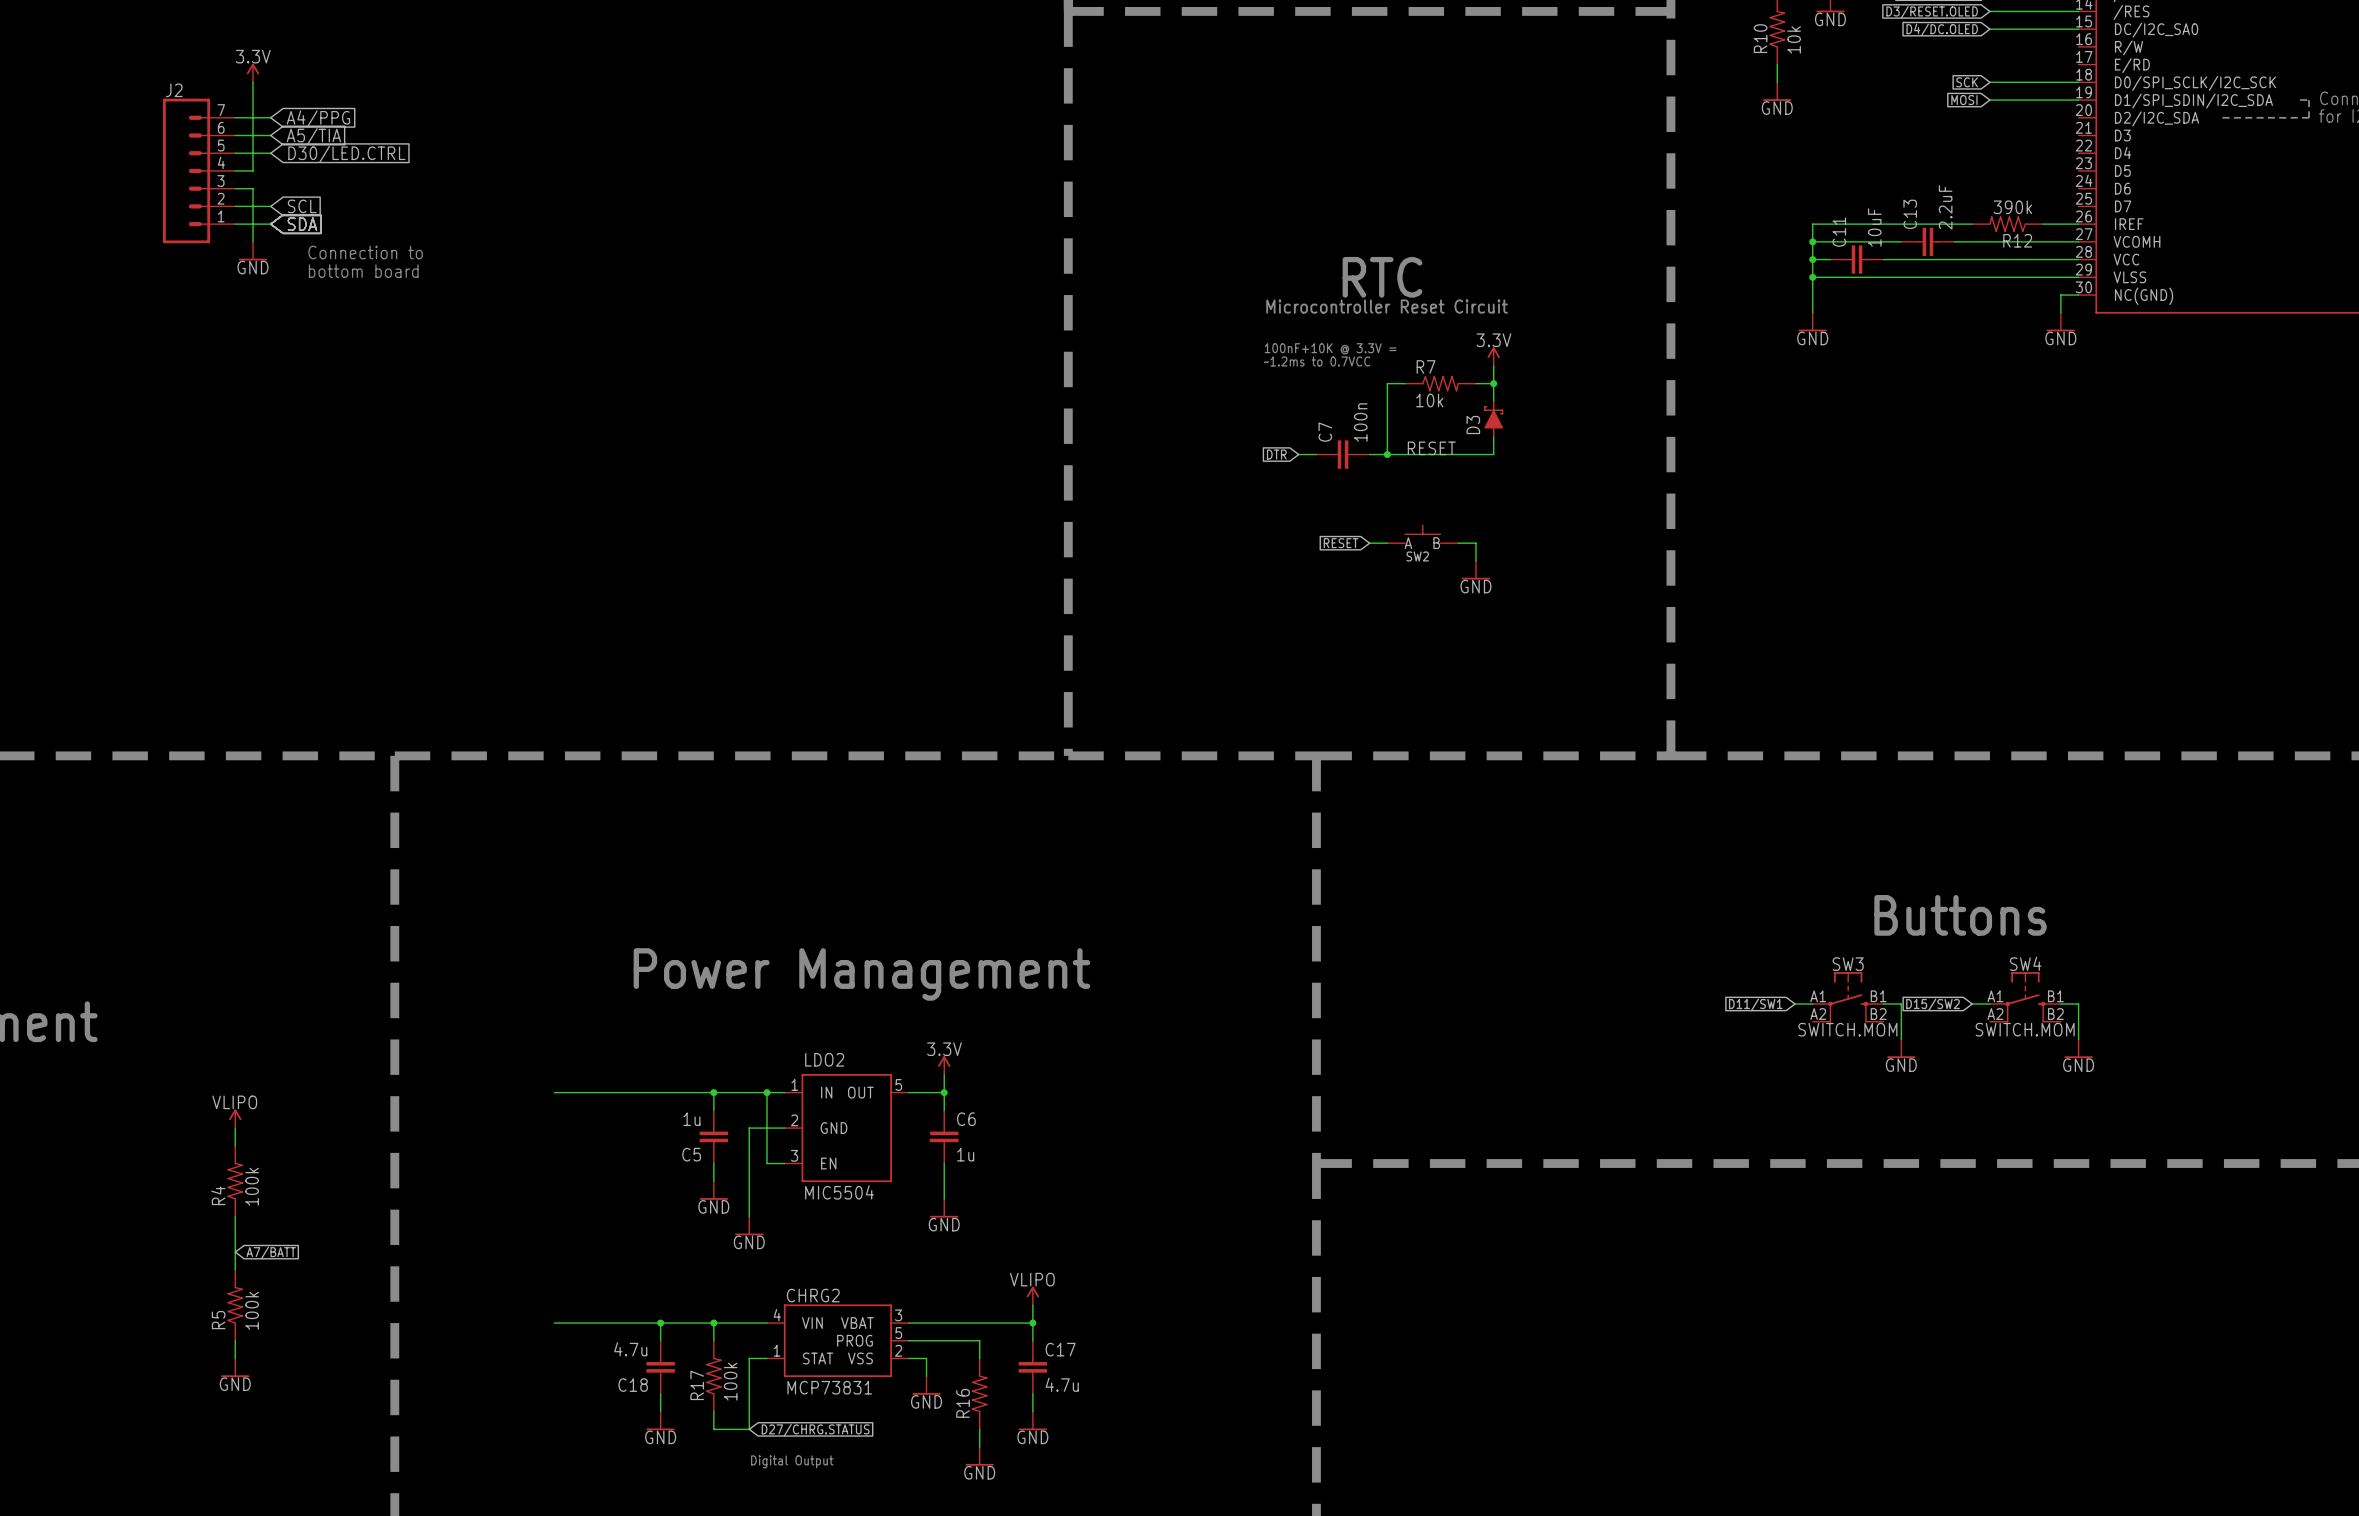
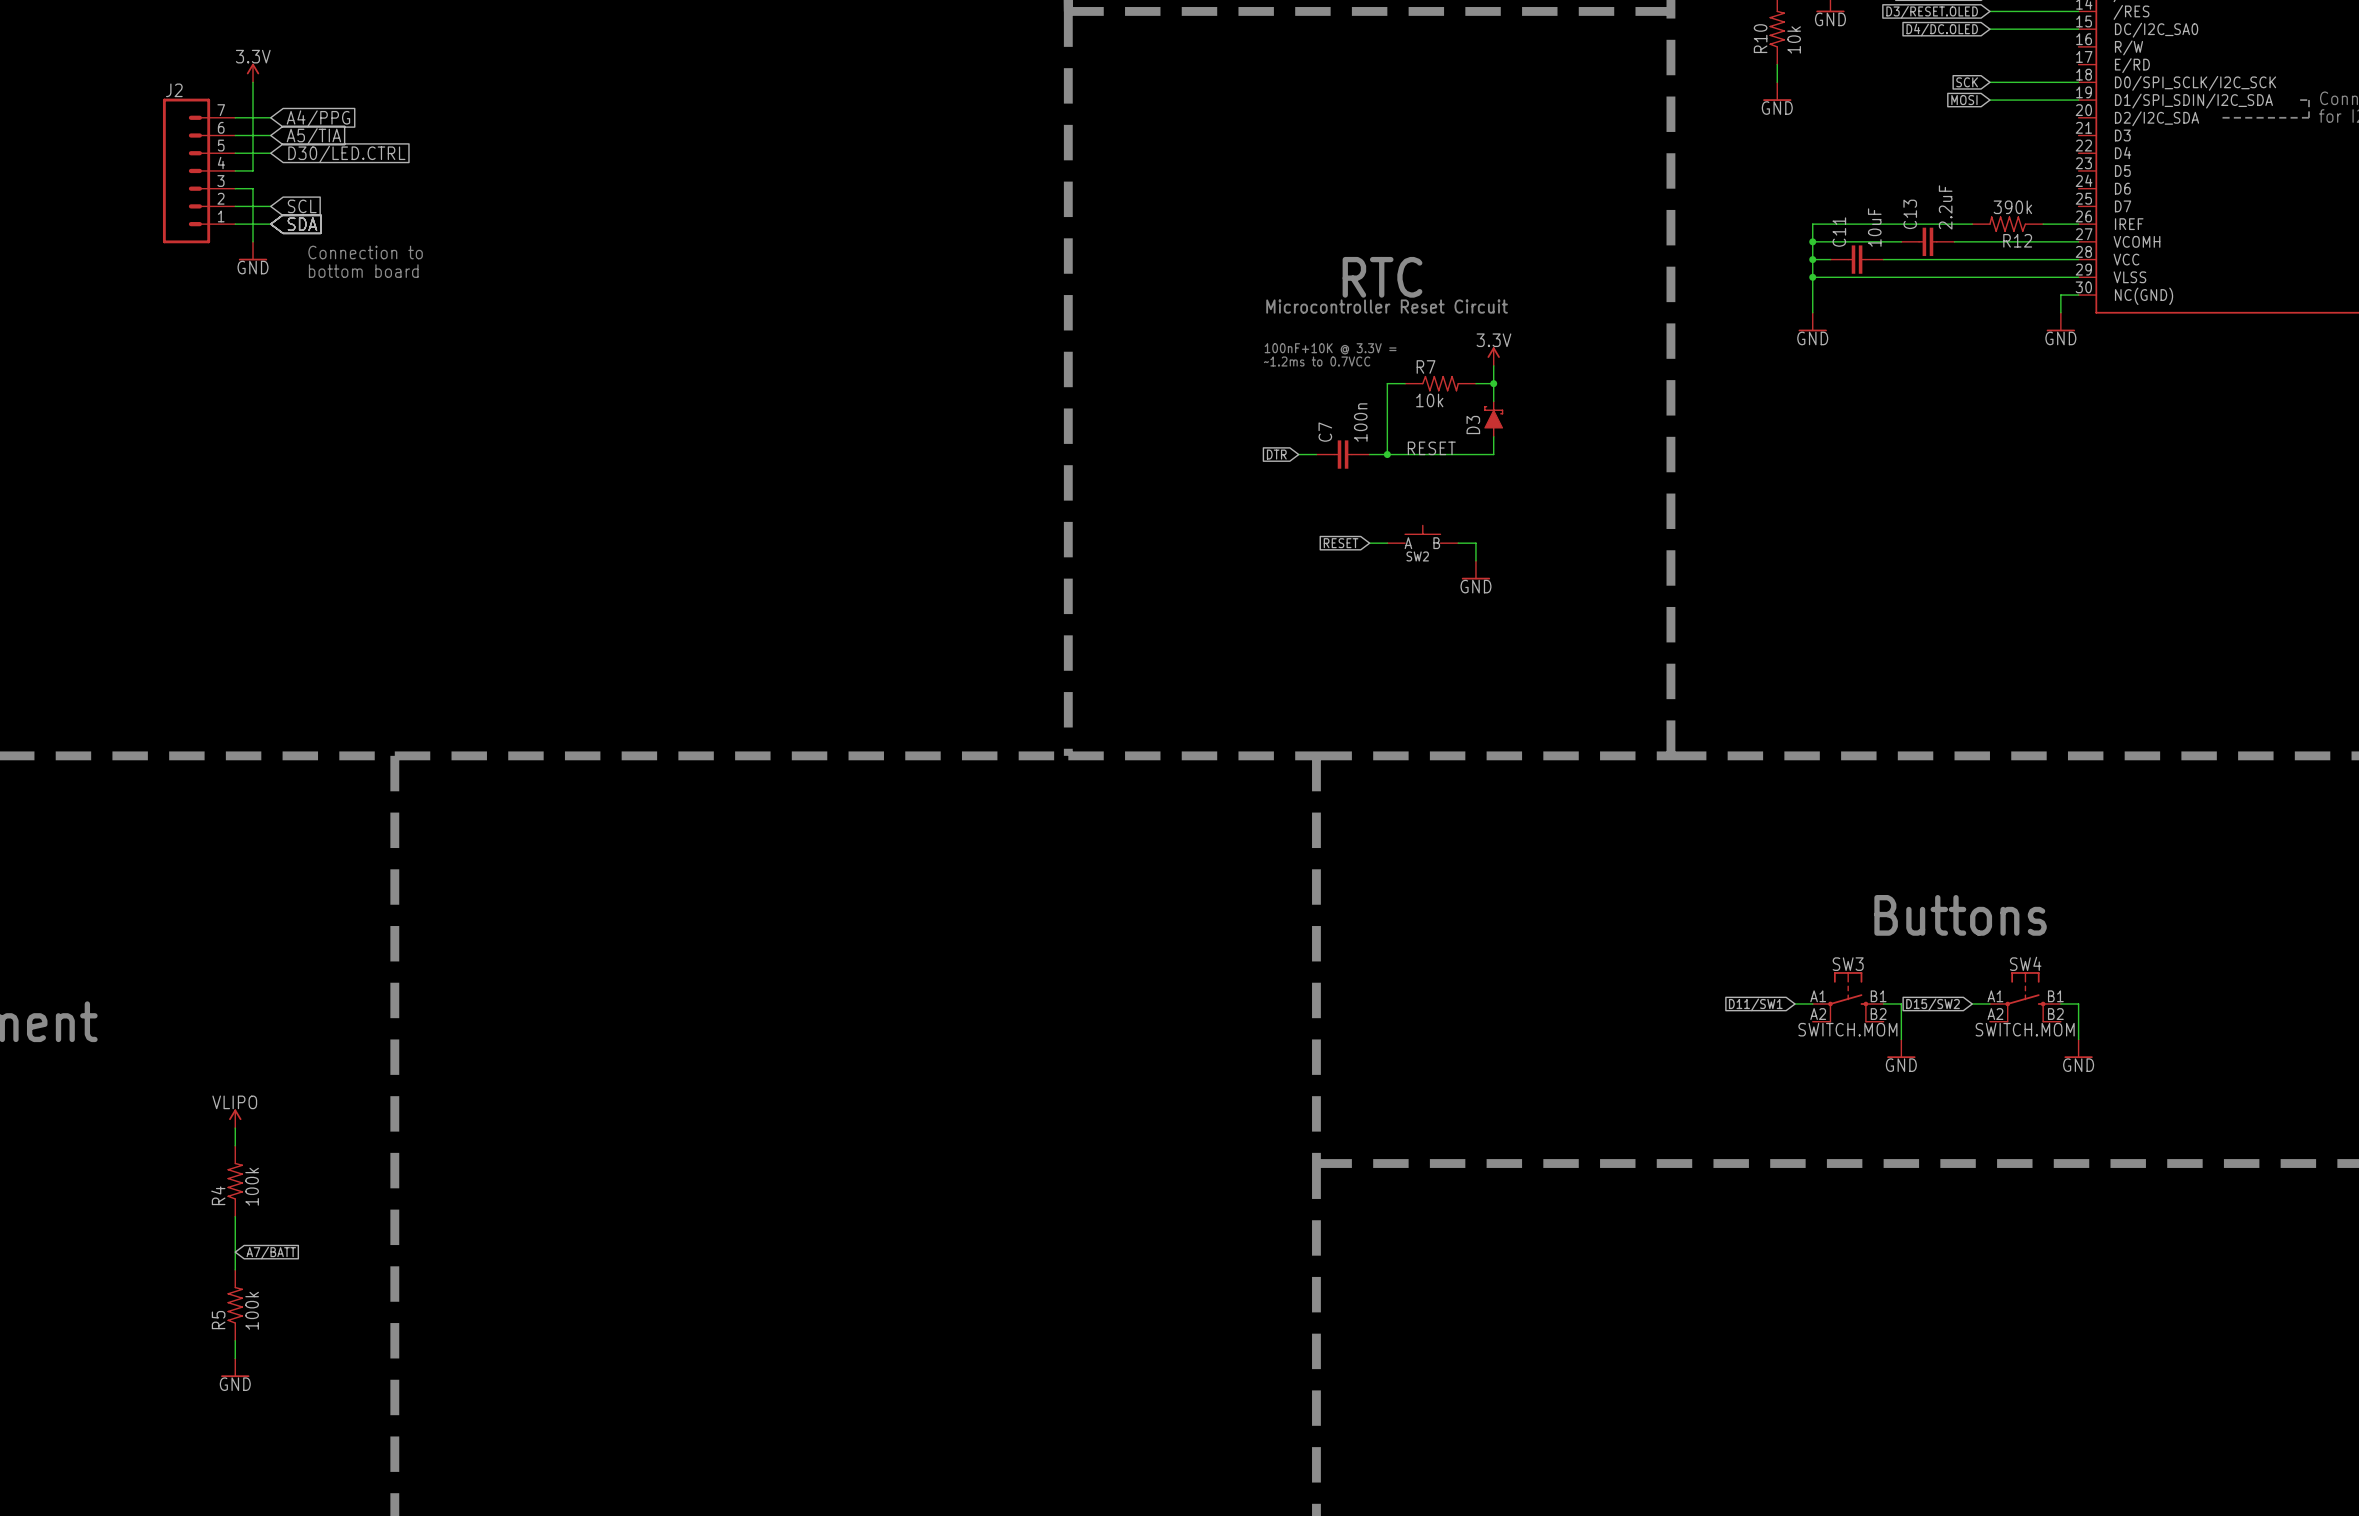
text: Power Management (861, 974) -> none
power symbol: 3.3V (944, 1065) -> none
wire: (944, 1074) (944, 1110) -> none
wire: (554, 1092) (784, 1092) -> none
wire: (713, 1092) (713, 1110) -> none
junction: (713, 1092) -> none
wire: (767, 1092) (767, 1163) (784, 1163) -> none
junction: (767, 1092) -> none
wire: (908, 1092) (944, 1092) -> none
junction: (944, 1092) -> none
wire: (784, 1128) (749, 1128) (749, 1216) -> none
LDO2: MIC5504 (846, 1128) -> none
C5: 1u (713, 1136) -> none
C6: 1u (944, 1136) -> none
wire: (713, 1163) (713, 1181) -> none
wire: (944, 1163) (944, 1198) -> none
power symbol: GND (713, 1190) -> none
power symbol: GND (944, 1208) -> none
power symbol: GND (749, 1225) -> none
power symbol: VLIPO (1032, 1296) -> none
wire: (1032, 1305) (1032, 1340) -> none
wire: (554, 1323) (767, 1323) -> none
wire: (660, 1323) (660, 1340) -> none
junction: (660, 1323) -> none
wire: (713, 1323) (713, 1340) -> none
junction: (713, 1323) -> none
wire: (908, 1323) (1032, 1323) -> none
junction: (1032, 1323) -> none
CHRG2: MCP73831 (837, 1340) -> none
wire: (908, 1340) (979, 1340) (979, 1358) -> none
wire: (767, 1358) (749, 1358) (749, 1429) (713, 1429) (713, 1411) -> none
wire: (908, 1358) (926, 1358) (926, 1376) -> none
C18: 4.7u (660, 1367) -> none
C17: 4.7u (1032, 1367) -> none
R17: 100k (713, 1376) -> none
power symbol: GND (926, 1385) -> none
wire: (660, 1393) (660, 1411) -> none
R16: (979, 1393) -> none
wire: (1032, 1393) (1032, 1411) -> none
power symbol: GND (660, 1420) -> none
power symbol: GND (1032, 1420) -> none
wire: (979, 1429) (979, 1447) -> none
global label: D27/CHRG.STATUS (815, 1430) -> none
power symbol: GND (979, 1456) -> none
text: Digital Output (792, 1461) -> none

